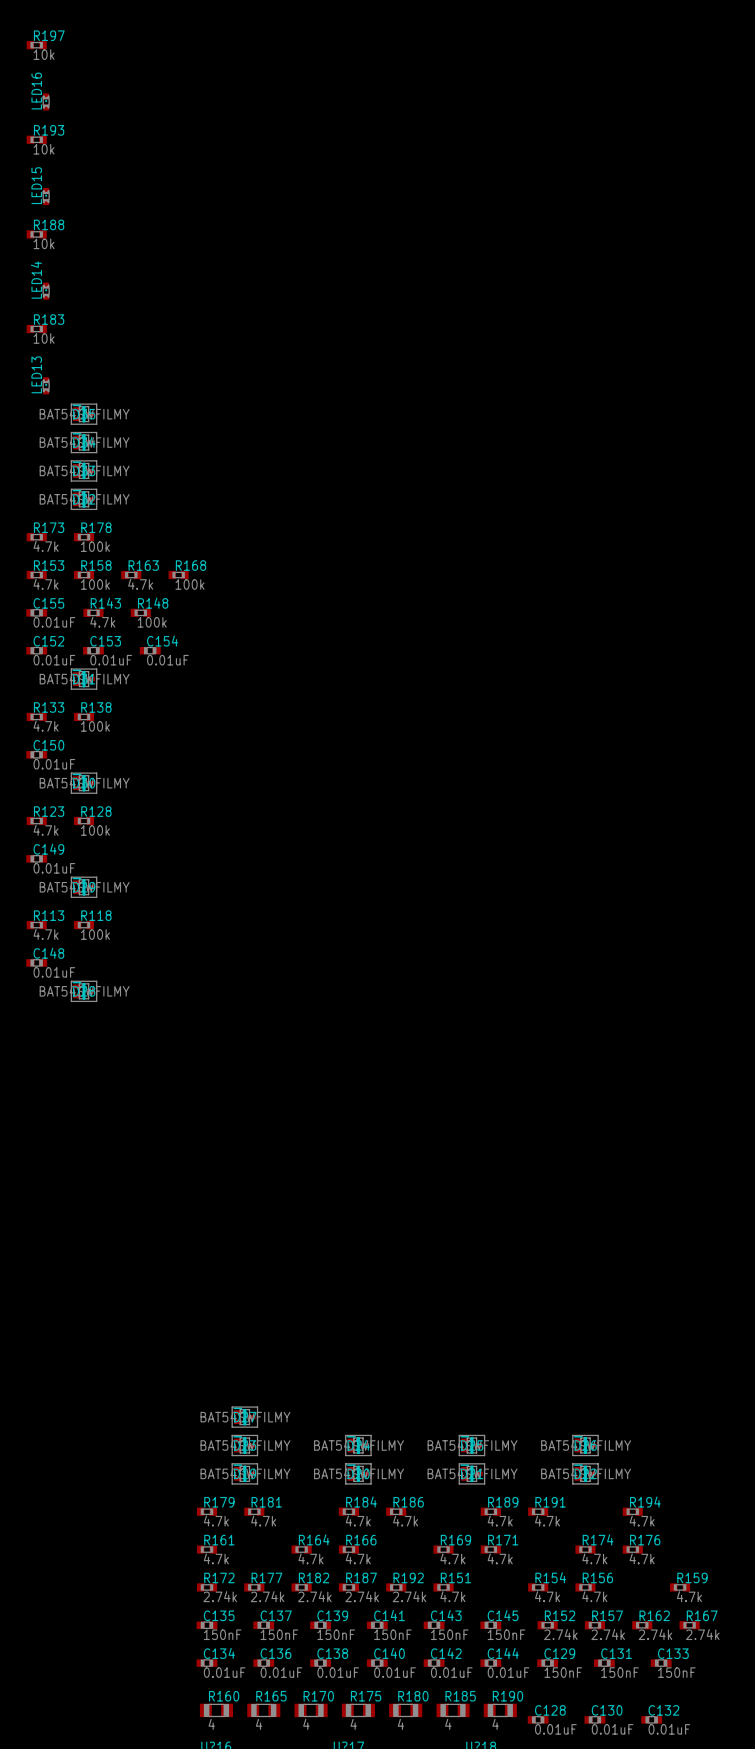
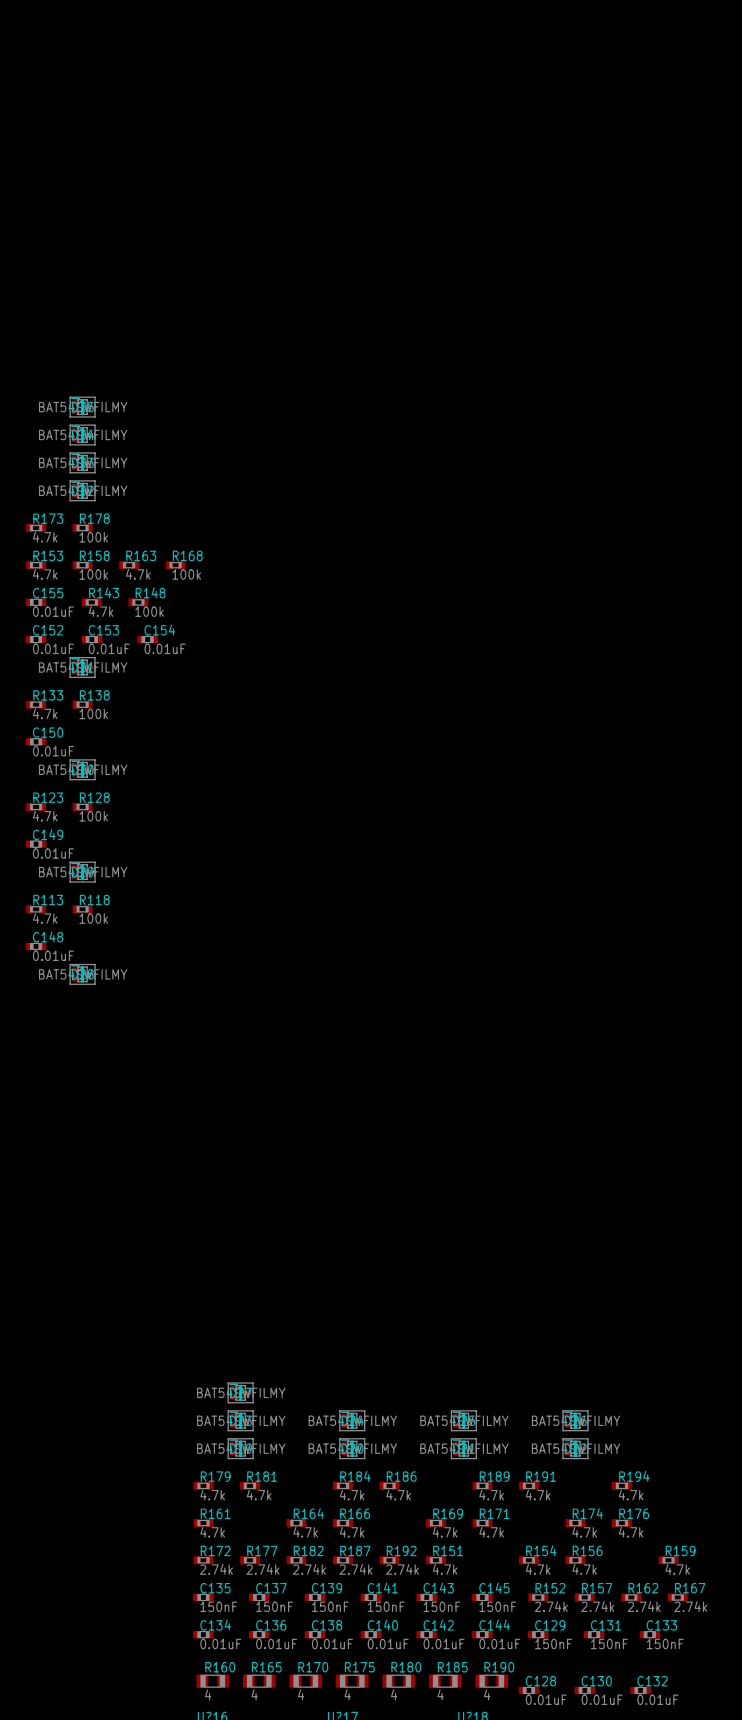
R197: 10k (36, 45) -> none
LED16: (46, 101) -> none
R193: 10k (36, 139) -> none
LED15: (46, 196) -> none
R188: 10k (36, 234) -> none
LED14: (46, 291) -> none
R183: 10k (36, 329) -> none
LED13: (46, 385) -> none

